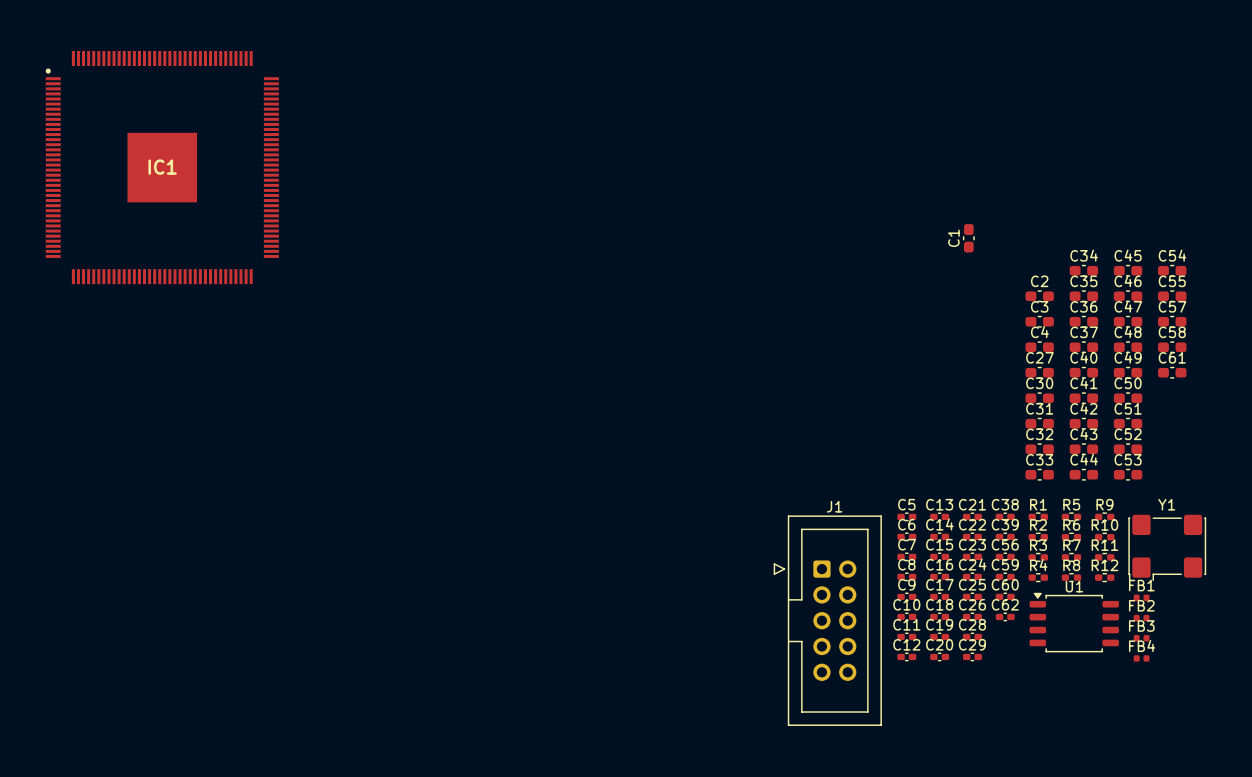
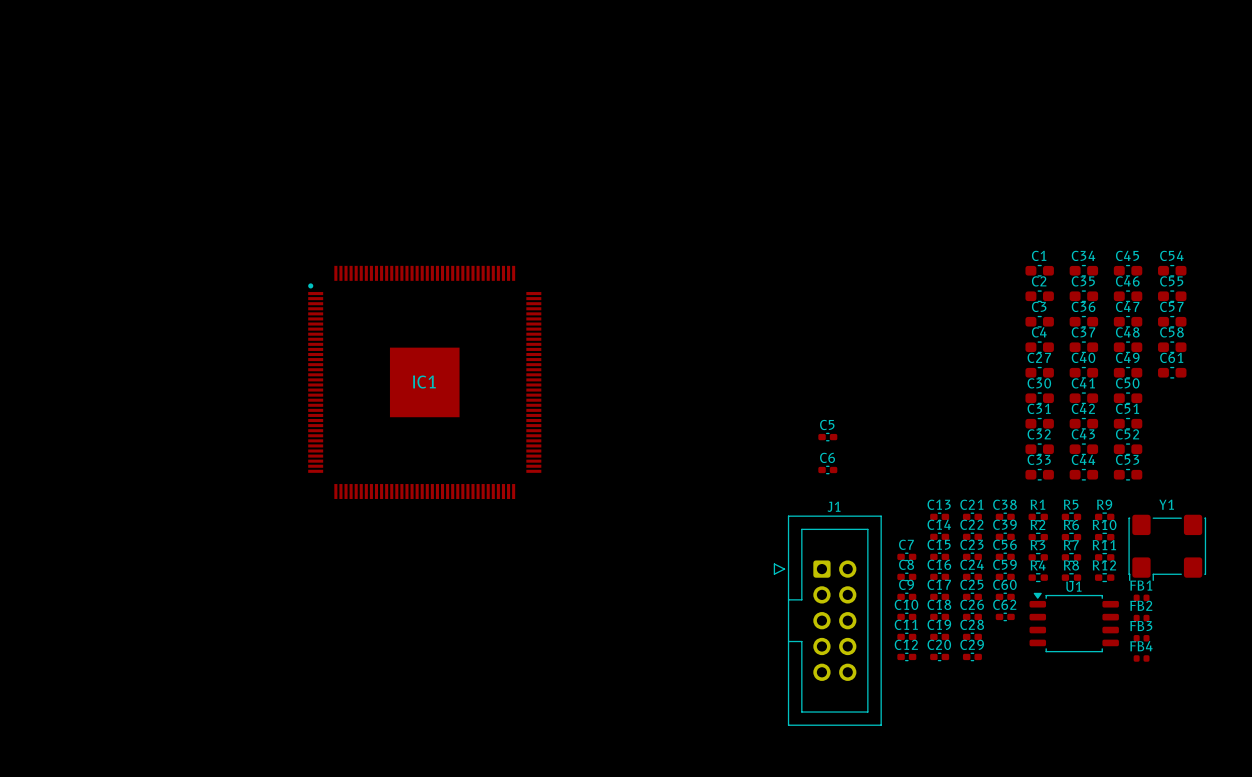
IC1 position: (162, 167) -> (424, 382)
C1 rotation: 0° (968, 238) -> 90° clockwise (1039, 270)
C1 position: (968, 238) -> (1039, 270)
C5 position: (906, 516) -> (827, 437)
C6 position: (906, 536) -> (827, 469)

